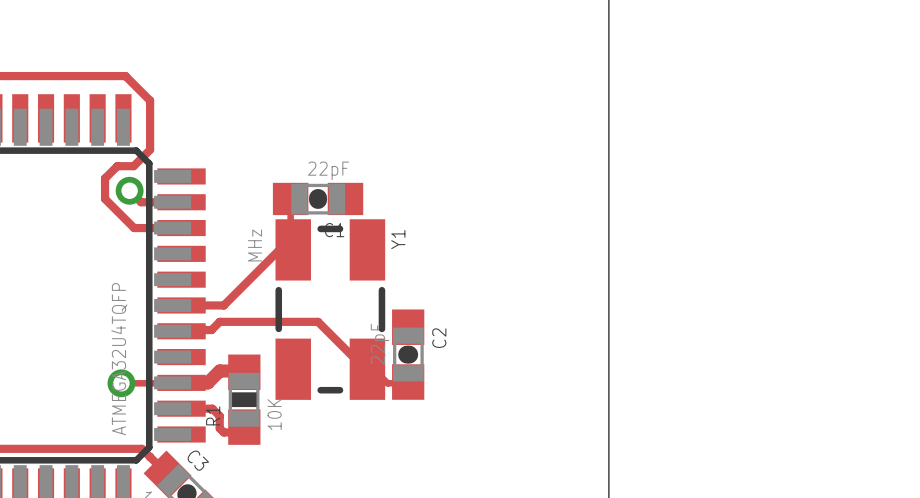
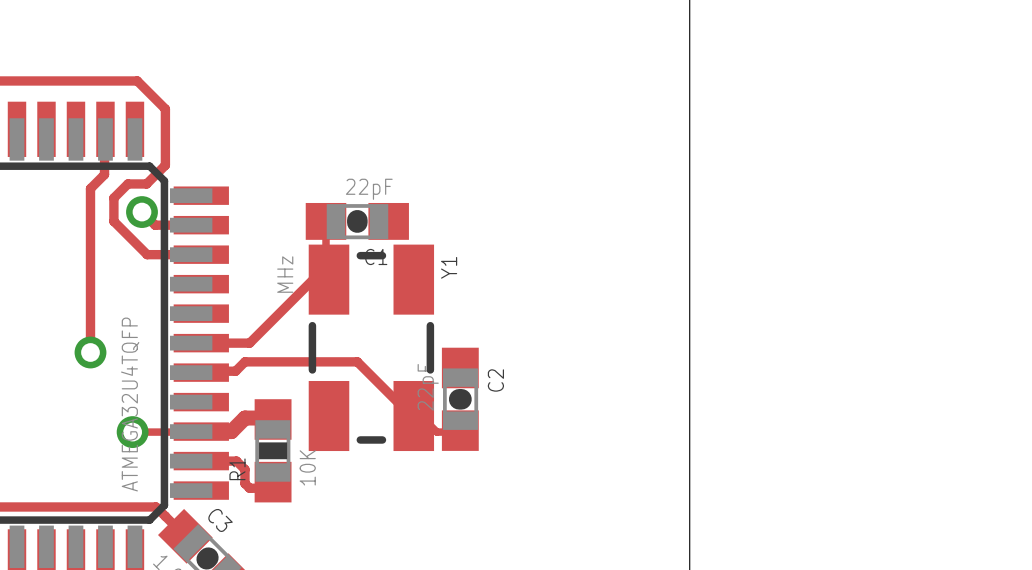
track: none -> (105, 129) (104, 174) (90, 188) (90, 352)
via: none -> (90, 352)

